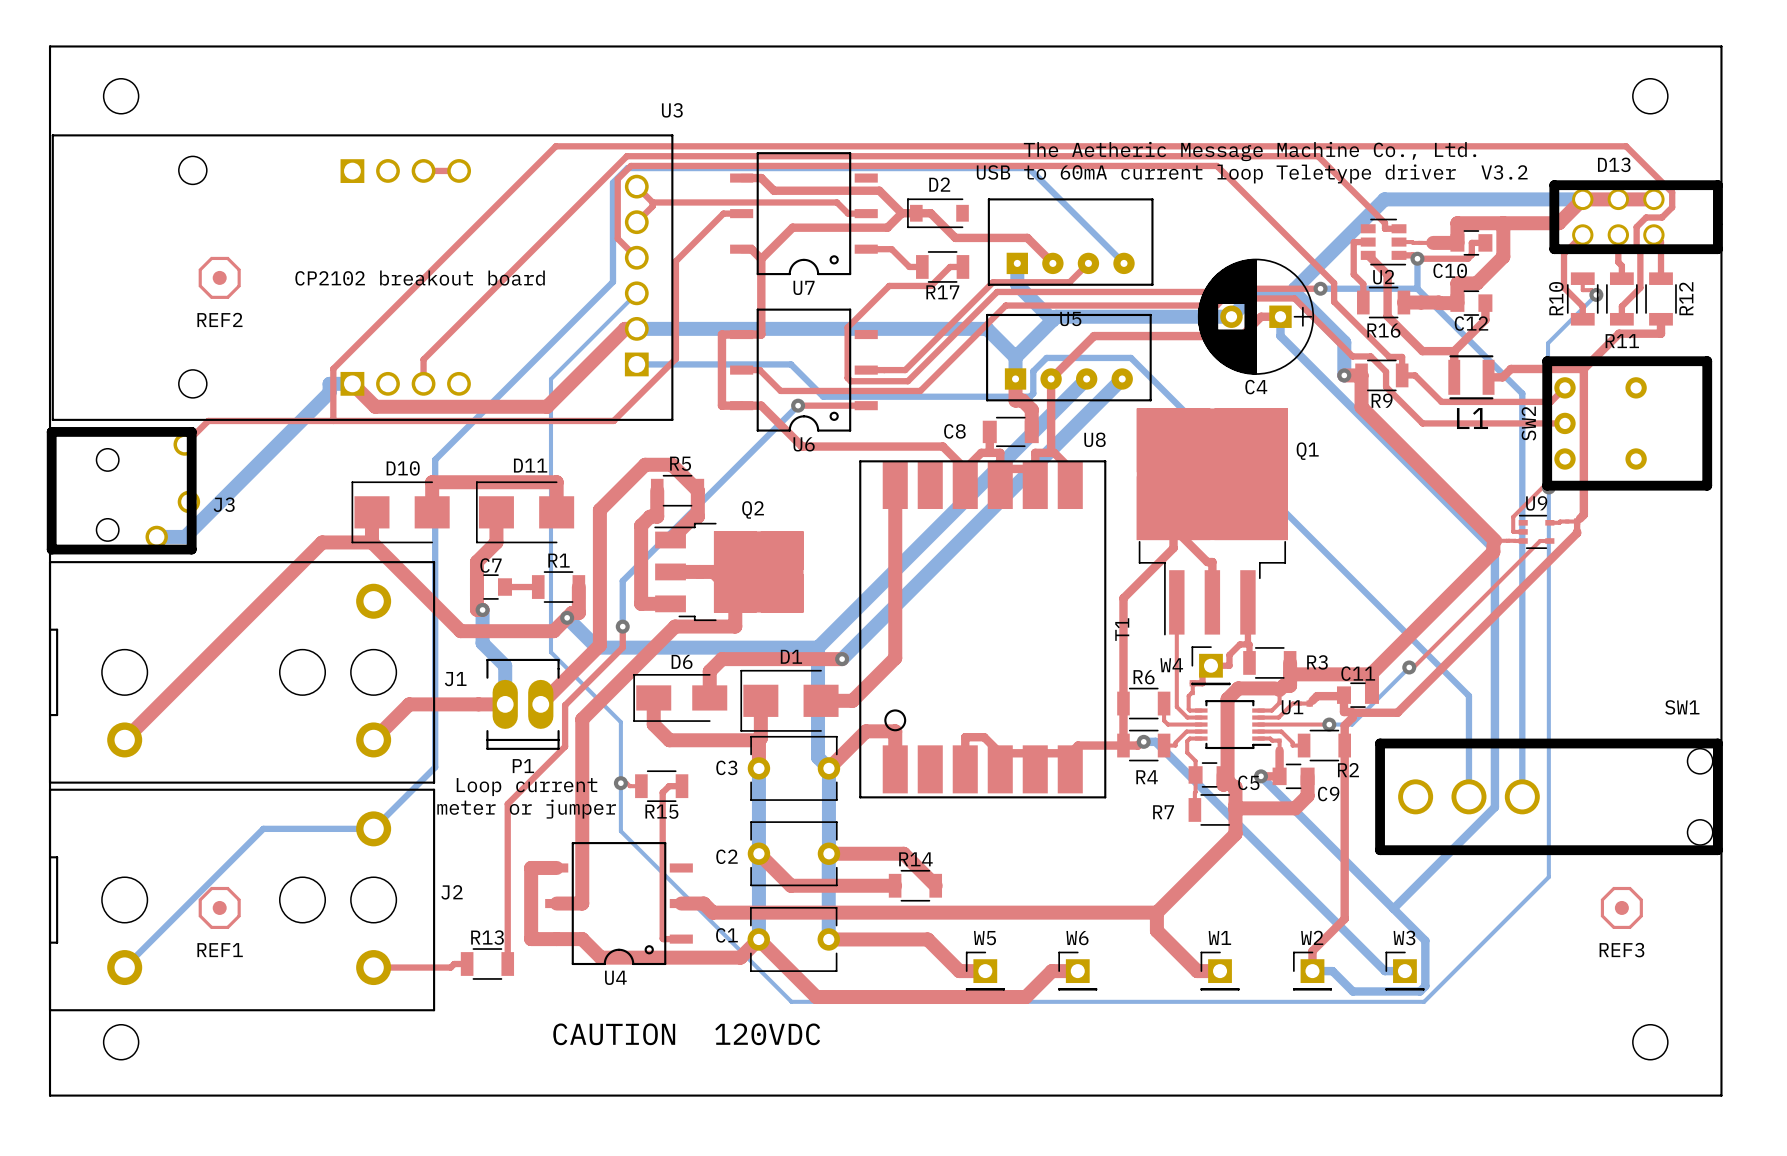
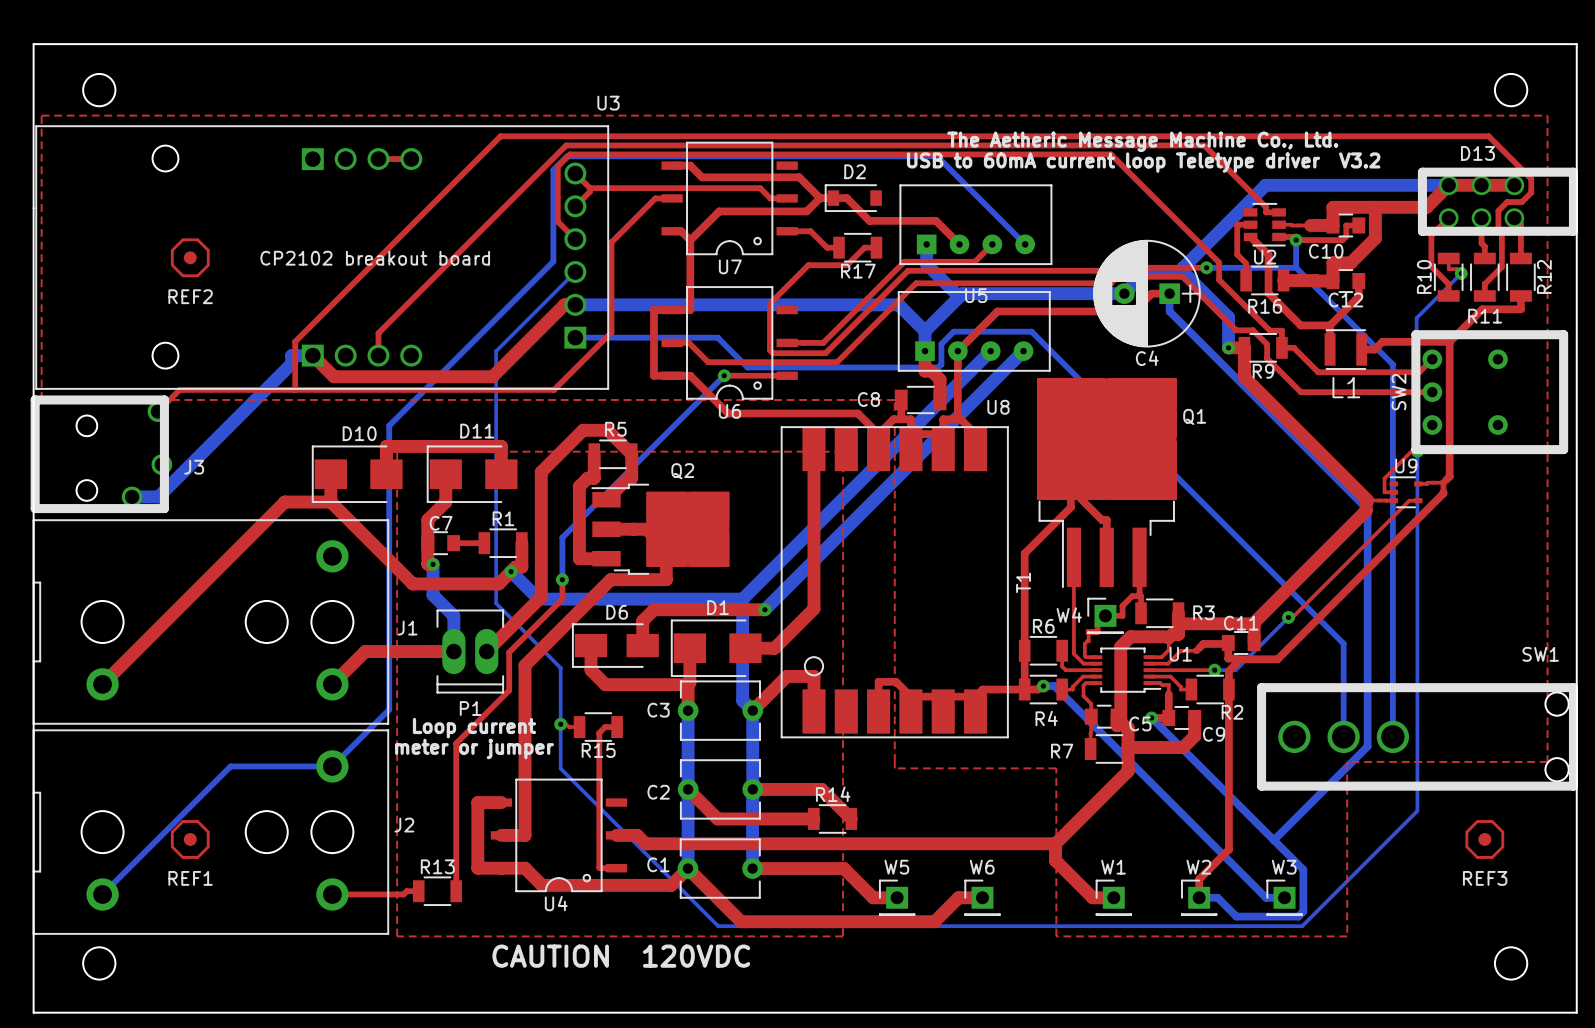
top zone outline: none -> (41, 115) (41, 399) (894, 399) (894, 768) (1056, 768) (1056, 936) (1347, 936) (1347, 761) (1547, 761) (1547, 115) (41, 115)
top zone outline: none -> (397, 451) (843, 451) (843, 936) (397, 936) (397, 451)

